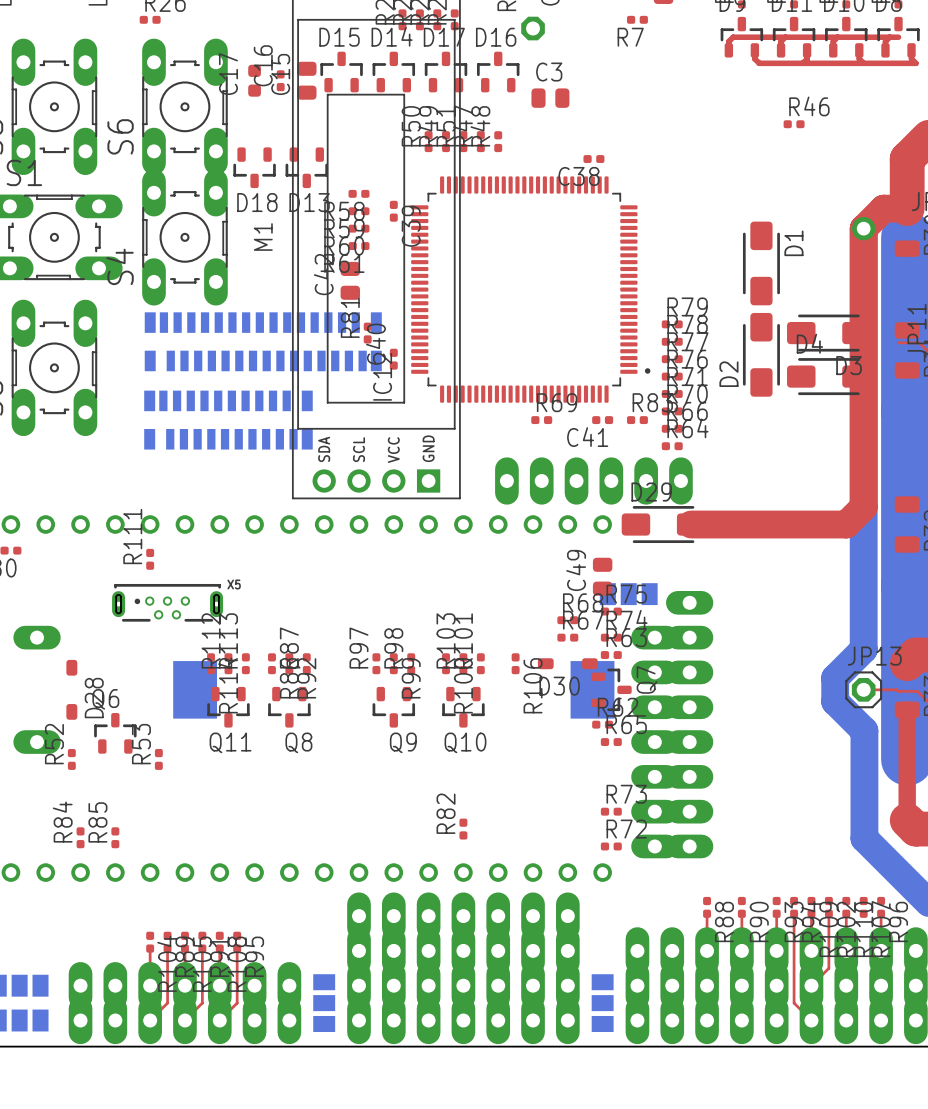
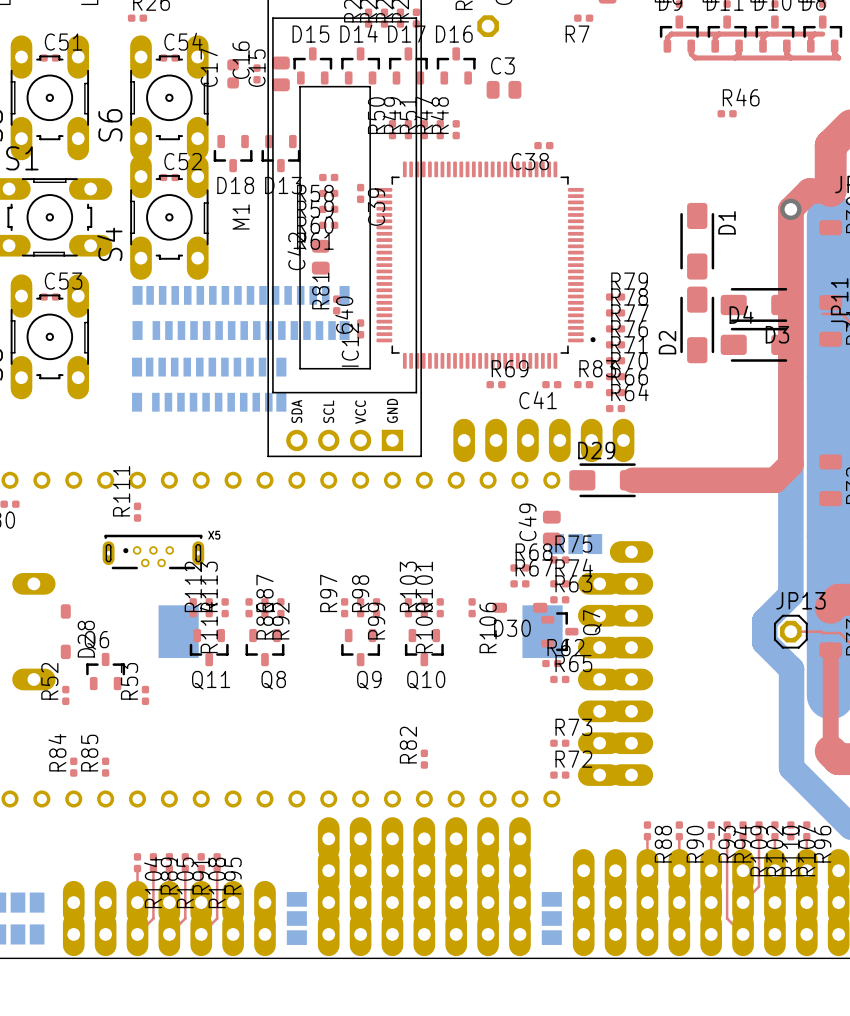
C51: none -> (49, 57)
C54: none -> (169, 57)
C52: none -> (169, 177)
C53: none -> (49, 297)

